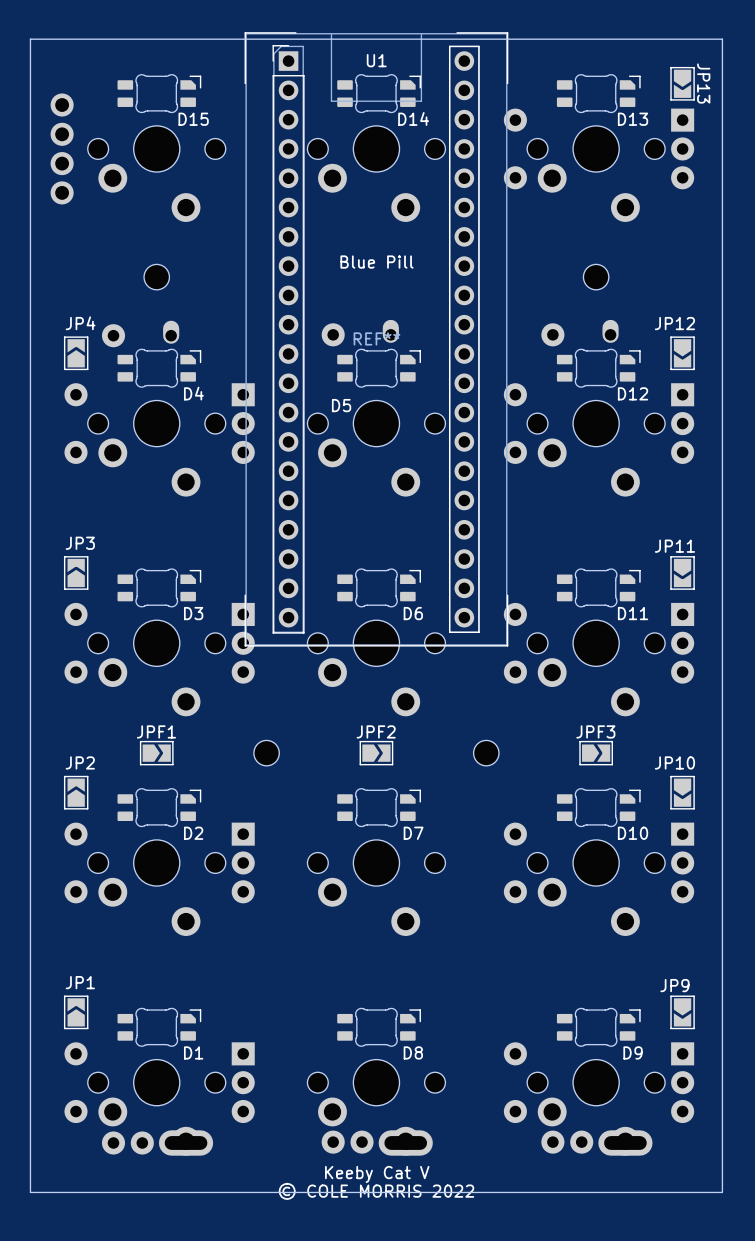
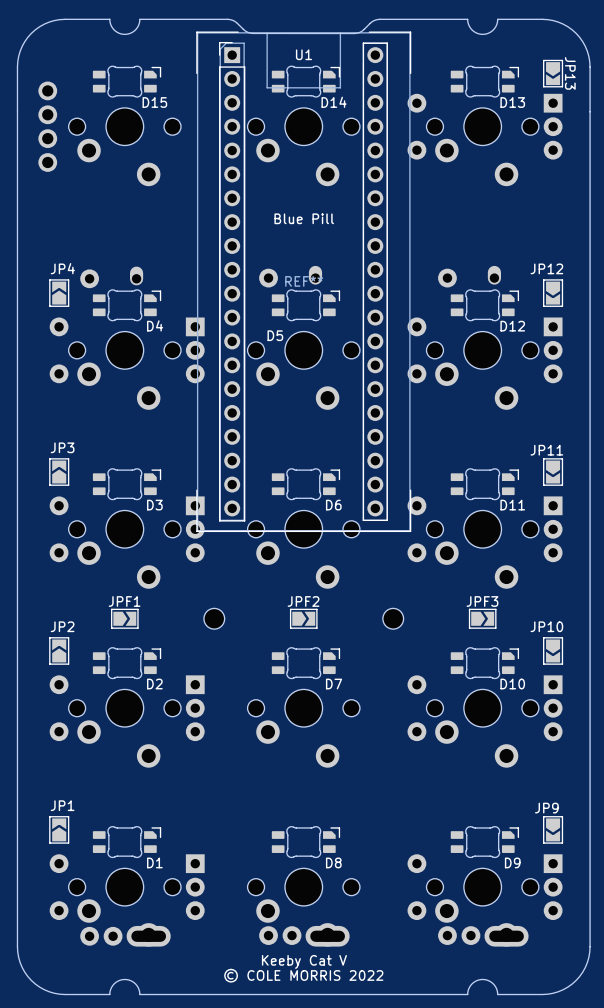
drawing: none -> [109, 18, 141, 35]
drawing: none -> [467, 18, 499, 35]
board edge: none -> (109, 19) (59, 19) (44, 24) (31, 33) (24, 41) (20, 51) (17, 67) (17, 952) (20, 962) (27, 976) (44, 989) (59, 994) (109, 994)
board edge: none -> (467, 19) (378, 19) (371, 22) (361, 31) (354, 33) (251, 33) (229, 19) (139, 19)
board edge: none -> (497, 19) (547, 19) (563, 24) (572, 29) (582, 41) (588, 56) (590, 67) (589, 952) (582, 972) (572, 984) (563, 989) (547, 994) (497, 994)
board edge: (722, 39) (30, 39) (30, 1192) (722, 1192) (722, 39) -> none
part: (156, 277) -> none
part: (596, 277) -> none
drawing: none -> [109, 979, 141, 995]
drawing: none -> [467, 979, 499, 995]
board edge: none -> (467, 994) (139, 994)

